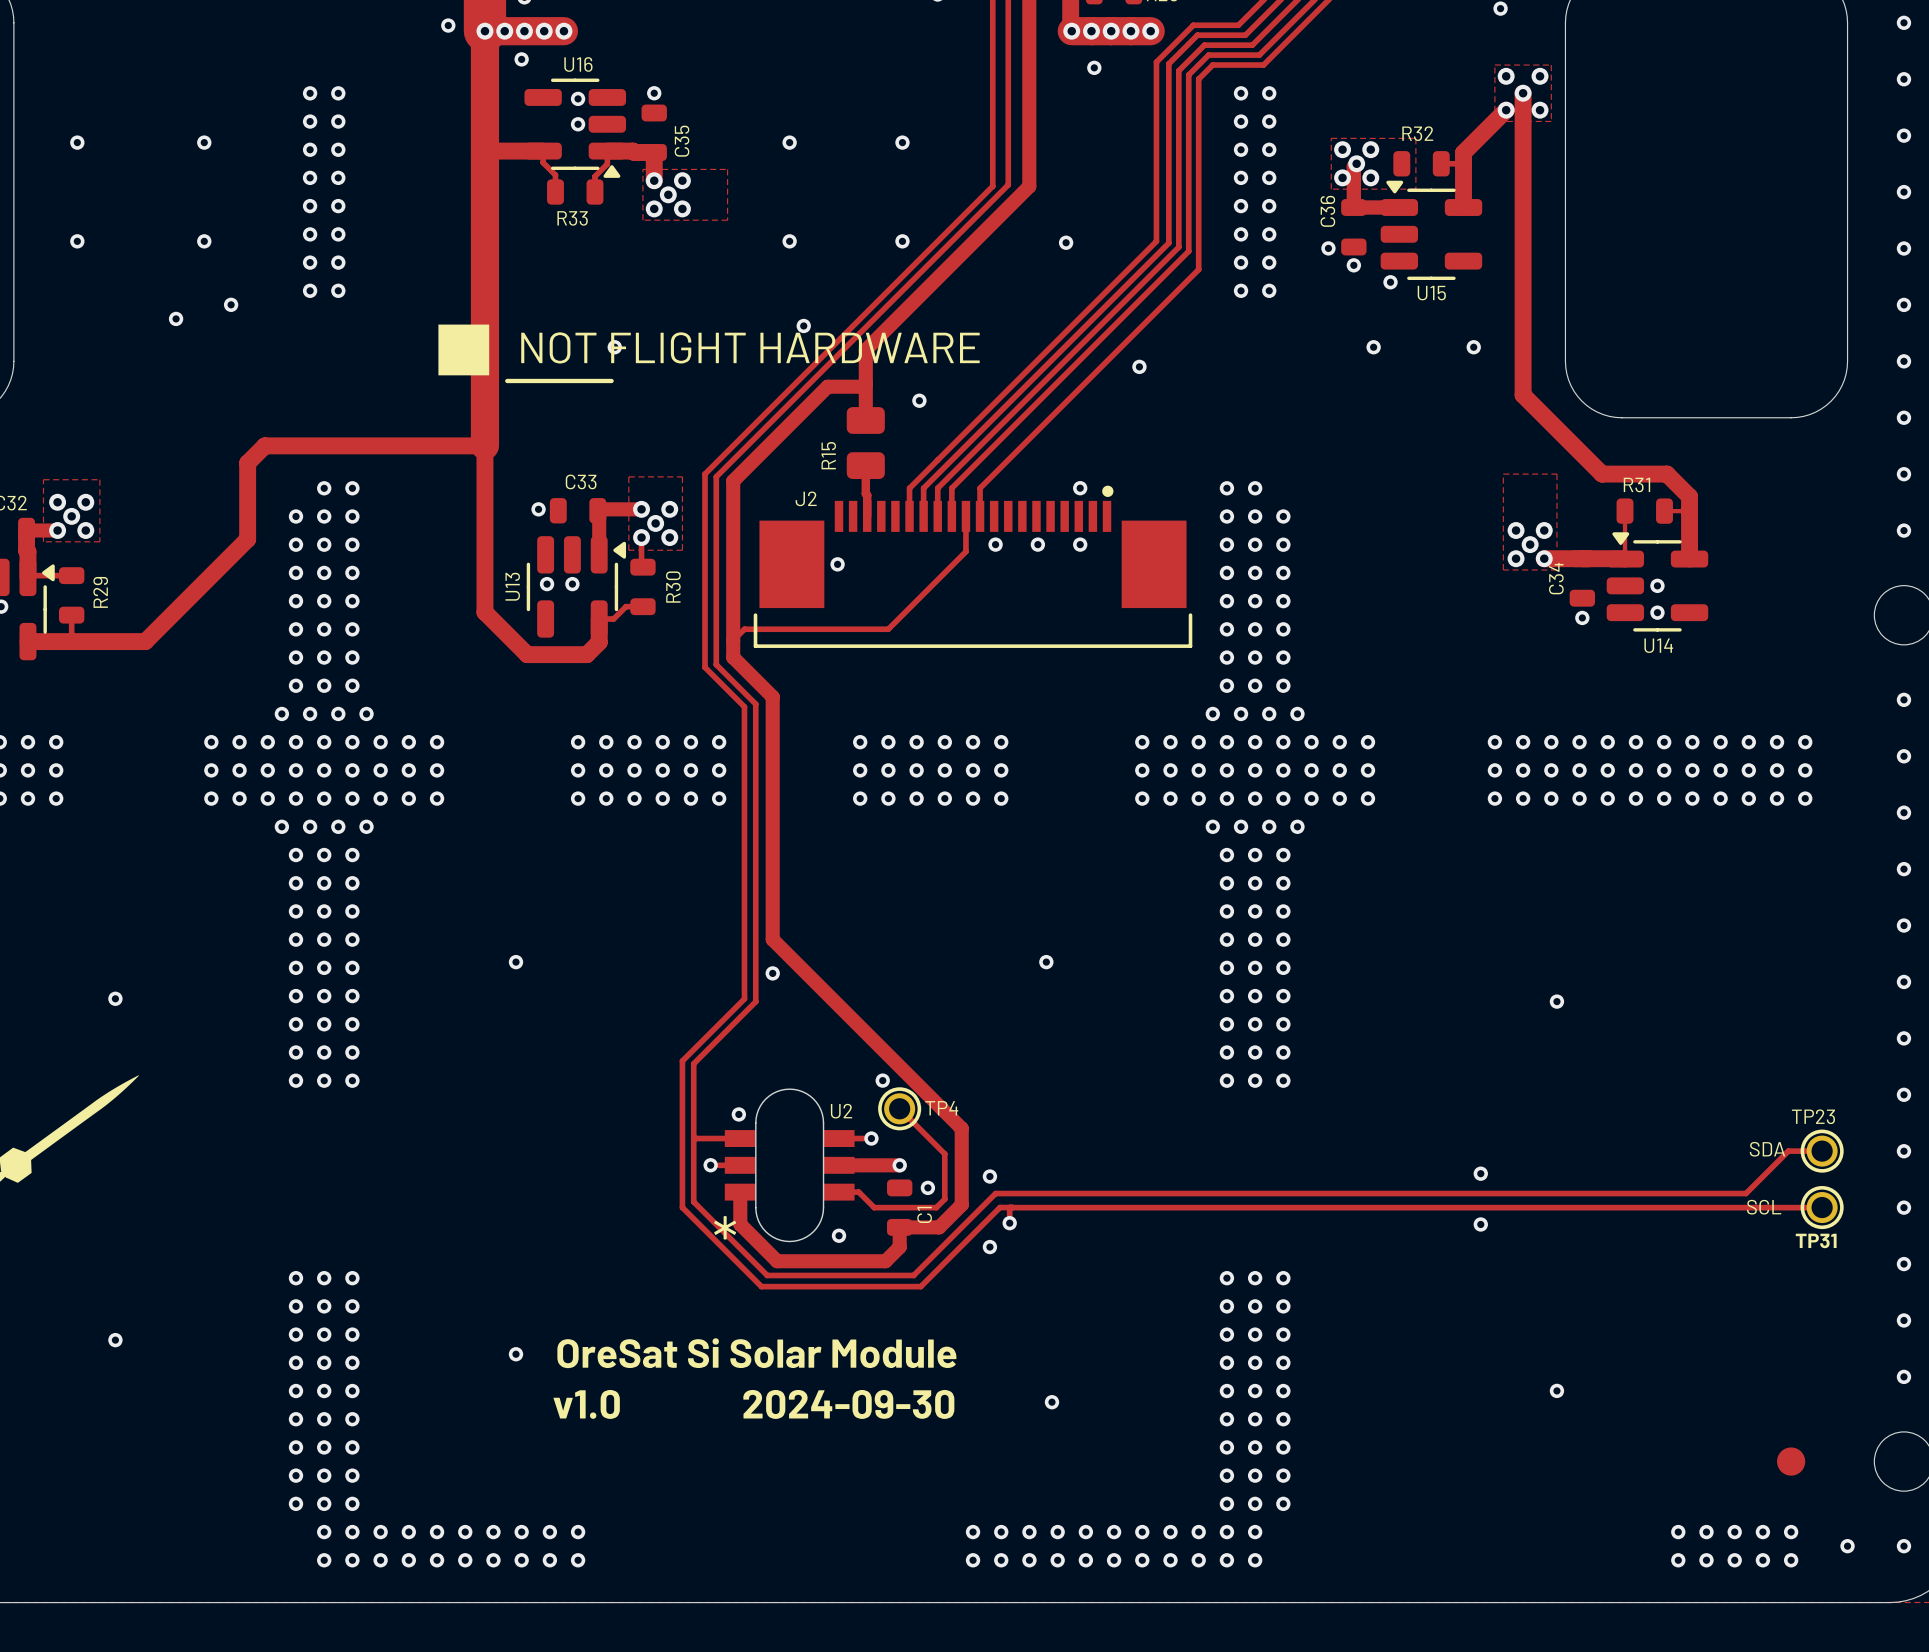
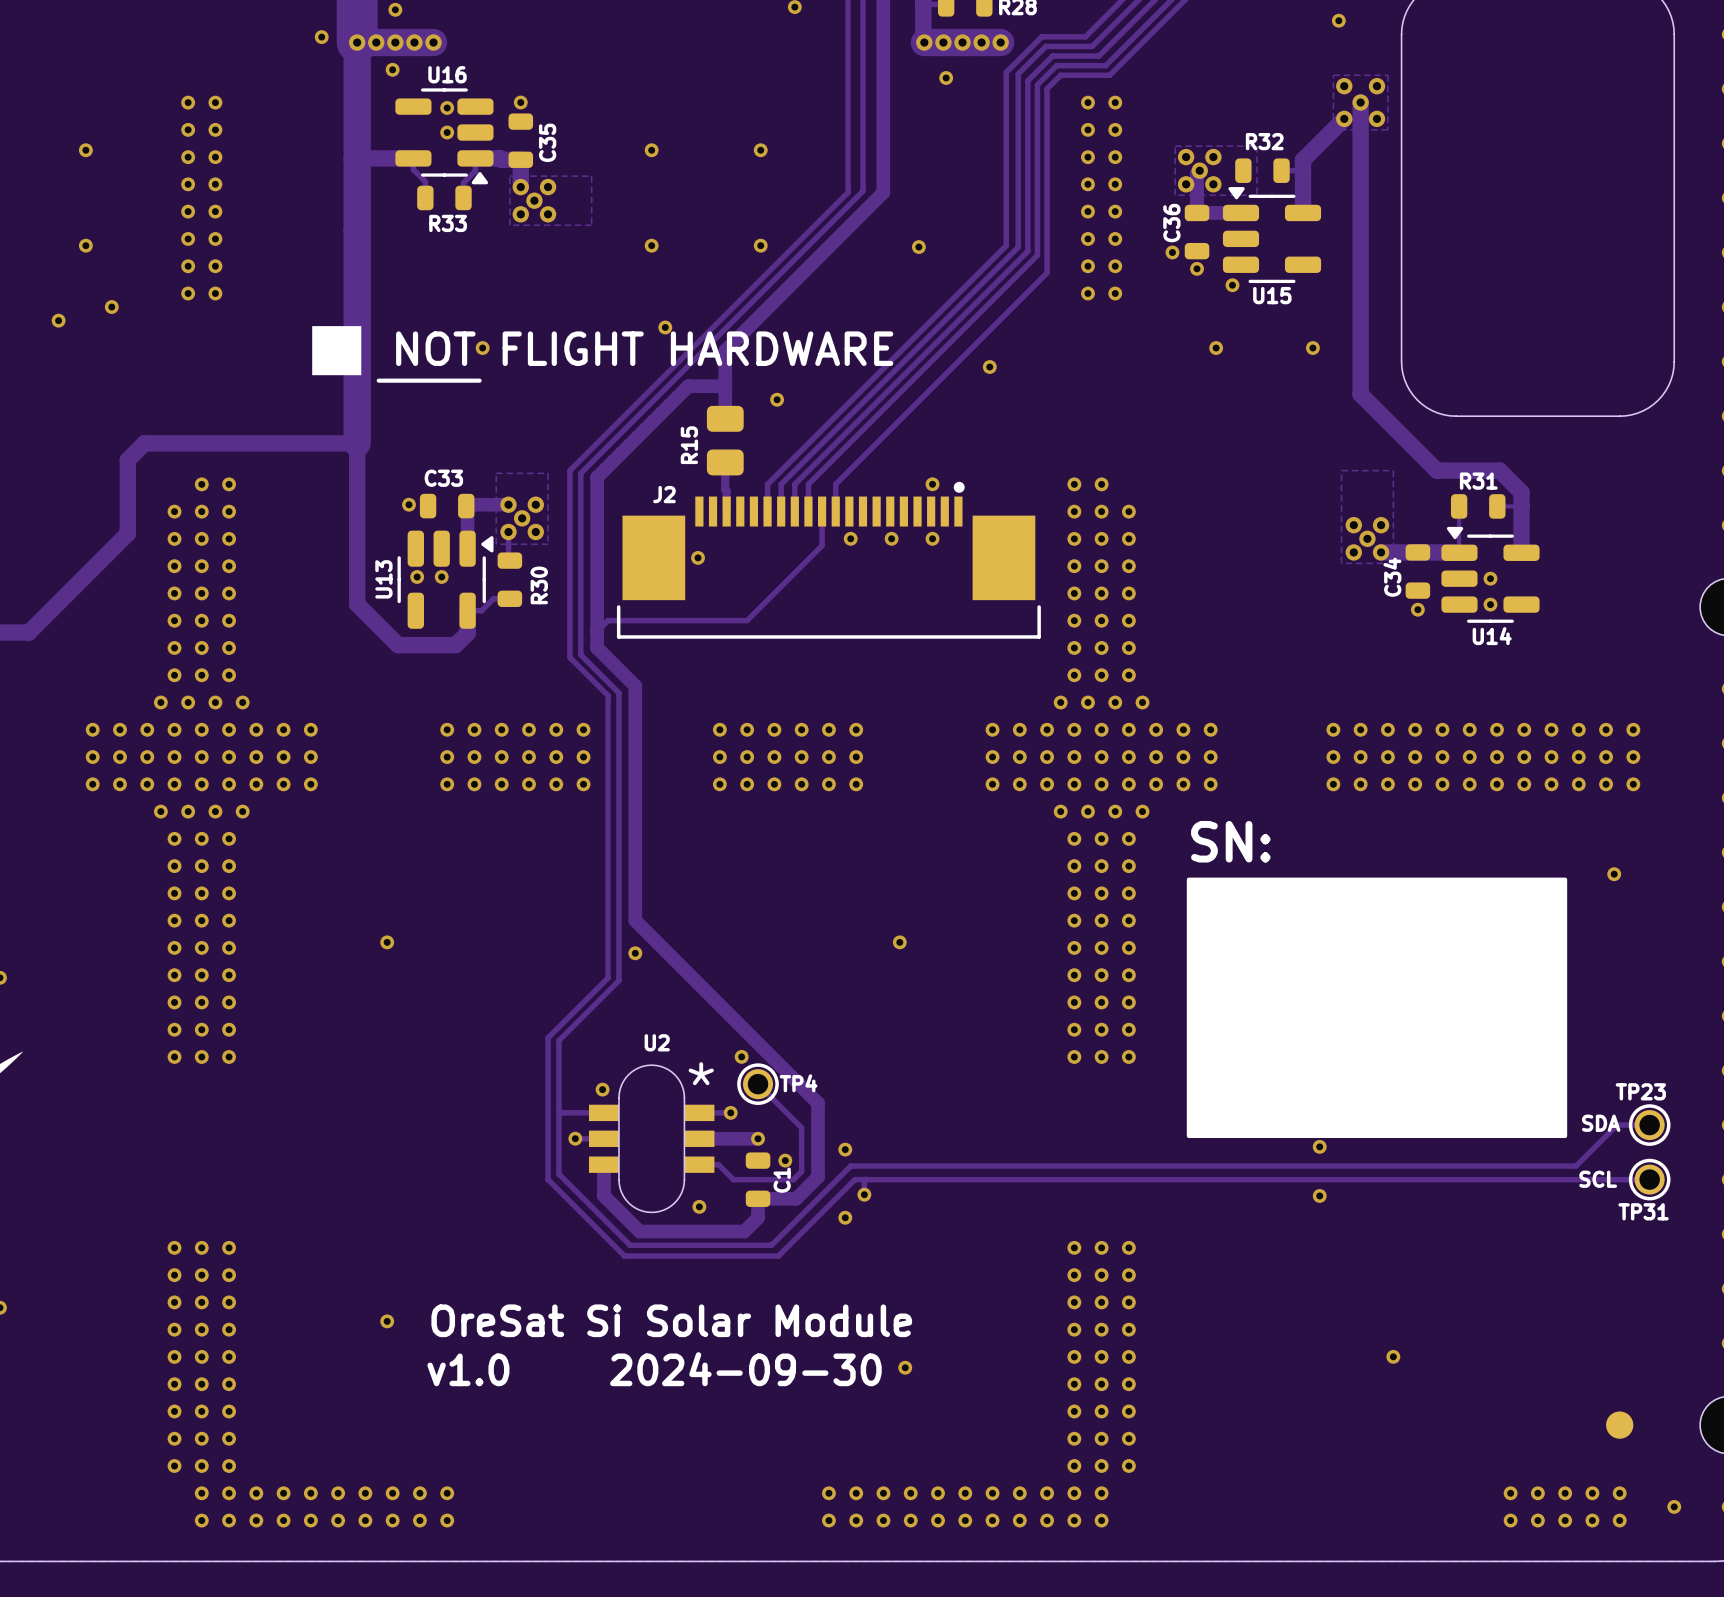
text: none -> SN: (1230, 841)
via: none -> (1614, 874)
drawing: none -> [1186, 877, 1568, 1139]
via: (1556, 1001) -> none
U2 name position: U2 (841, 1111) -> U2 (657, 1042)
U2 text position: * (725, 1227) -> * (701, 1073)

